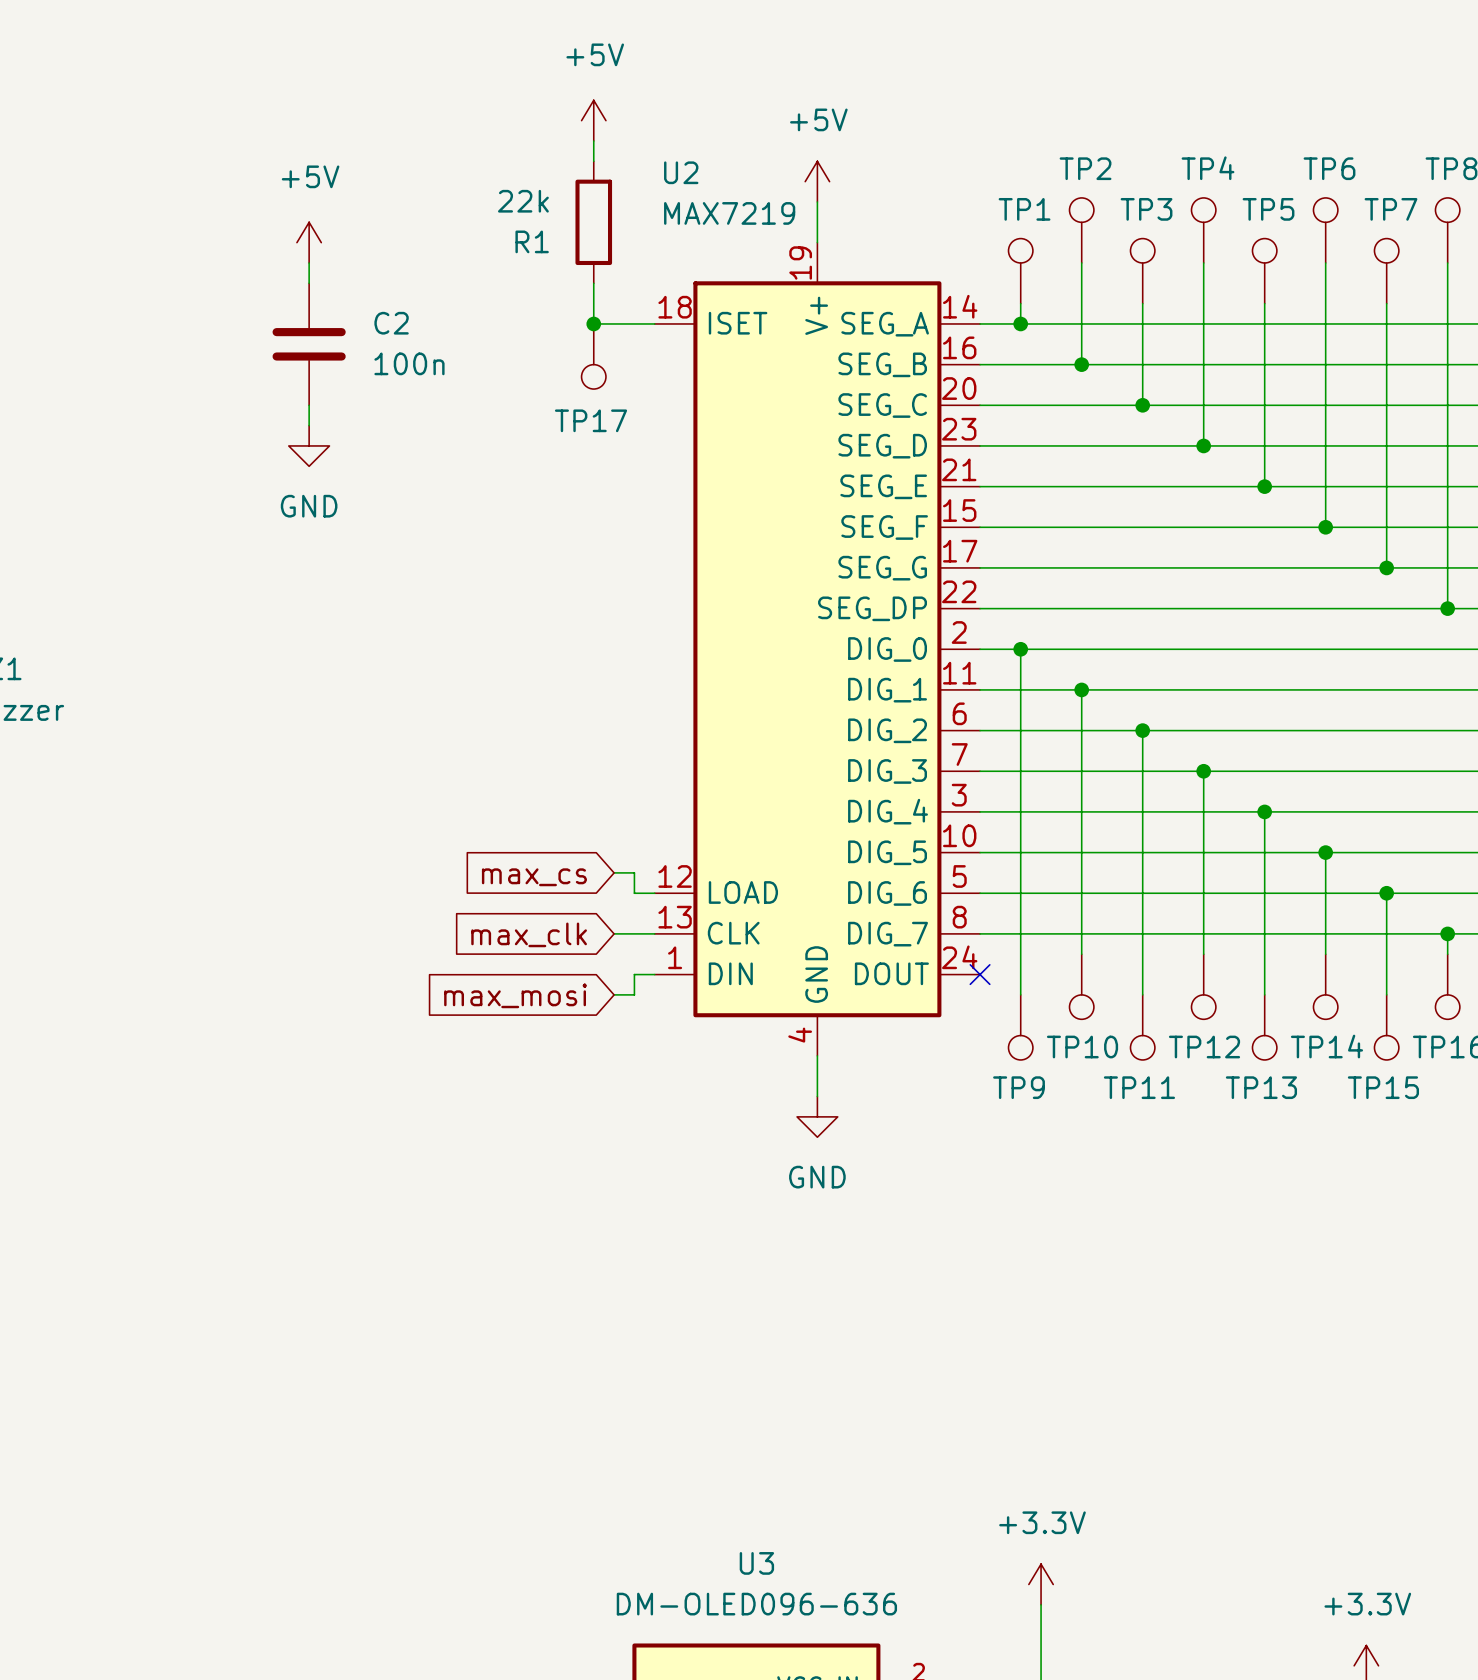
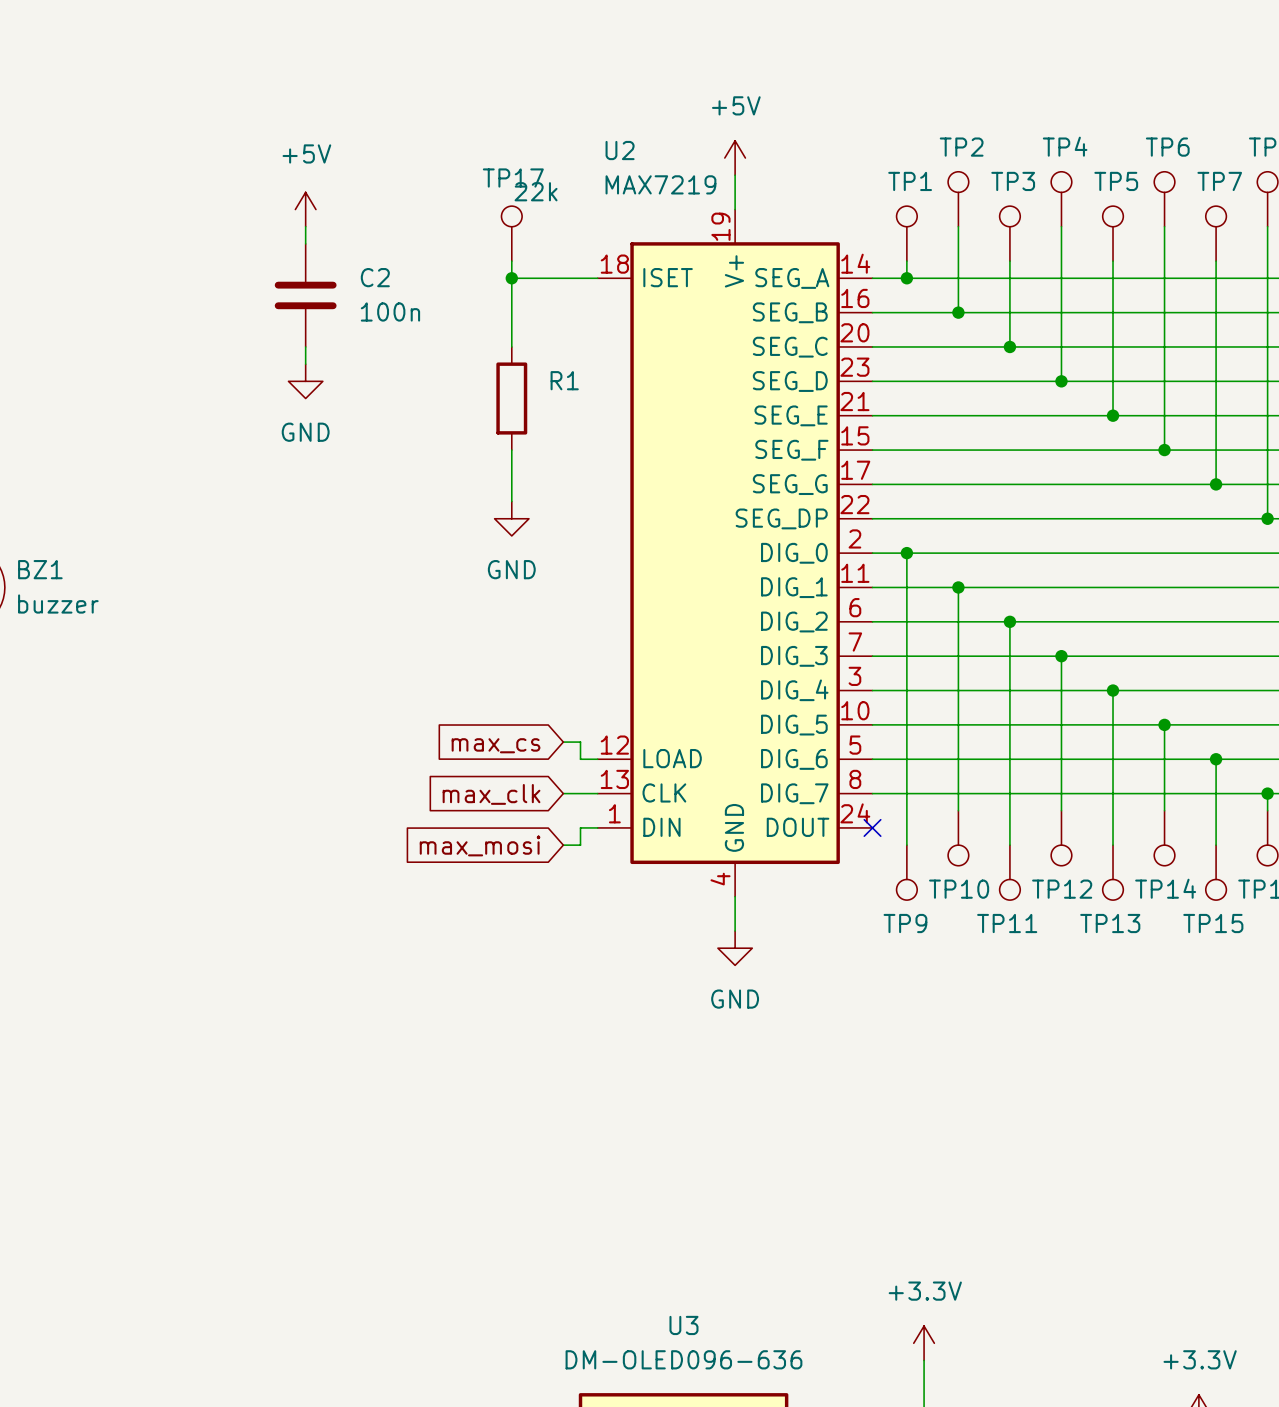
power symbol: +5V (593, 120) -> none
wire: (593, 141) (593, 161) -> none
R1 value position: 22k (523, 201) -> 22k (536, 191)
R1 position: (593, 222) -> (511, 398)
R1 name position: R1 (532, 241) -> R1 (564, 380)
wire: (593, 283) (593, 323) -> (511, 278) (546, 278)
wire: none -> (511, 261) (511, 346)
junction position: (593, 323) -> (511, 278)
TP17 position: (593, 356) -> (511, 233)
TP17 rotation: 0° (593, 376) -> 180° (511, 216)
wire: none -> (511, 450) (511, 501)
power symbol: none -> GND (511, 518)

